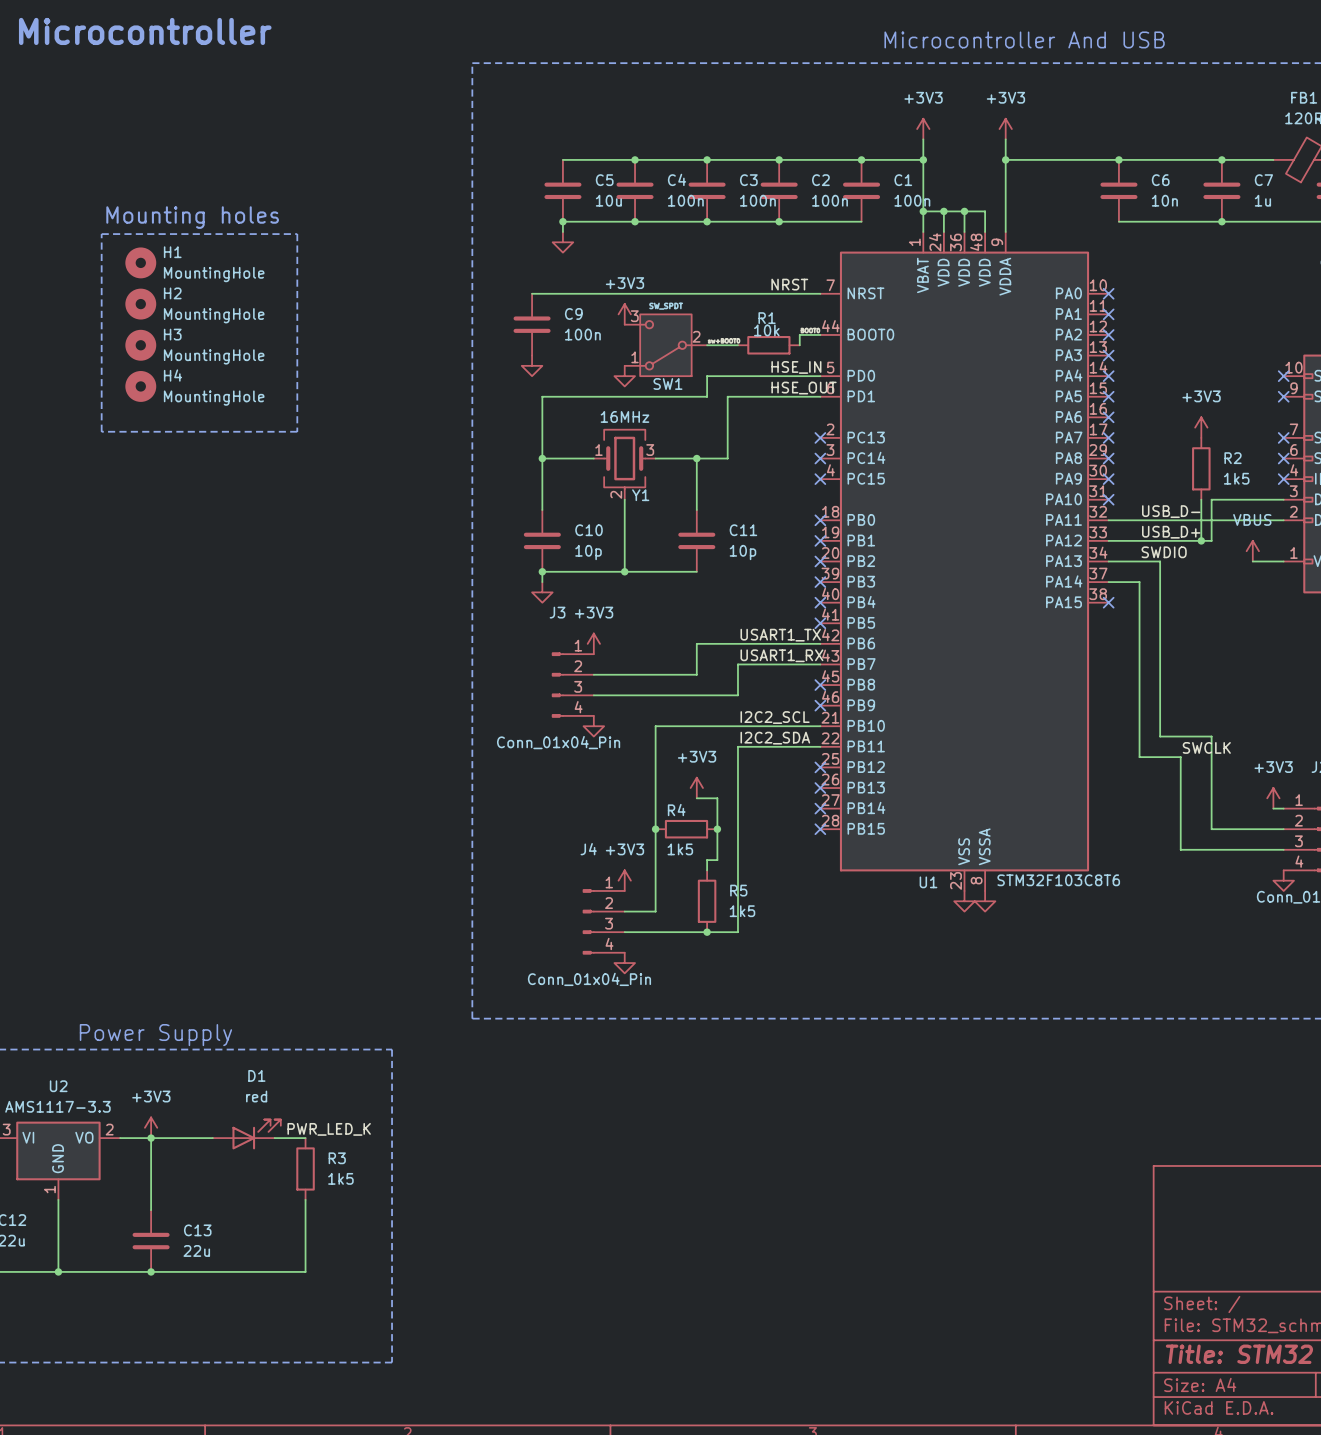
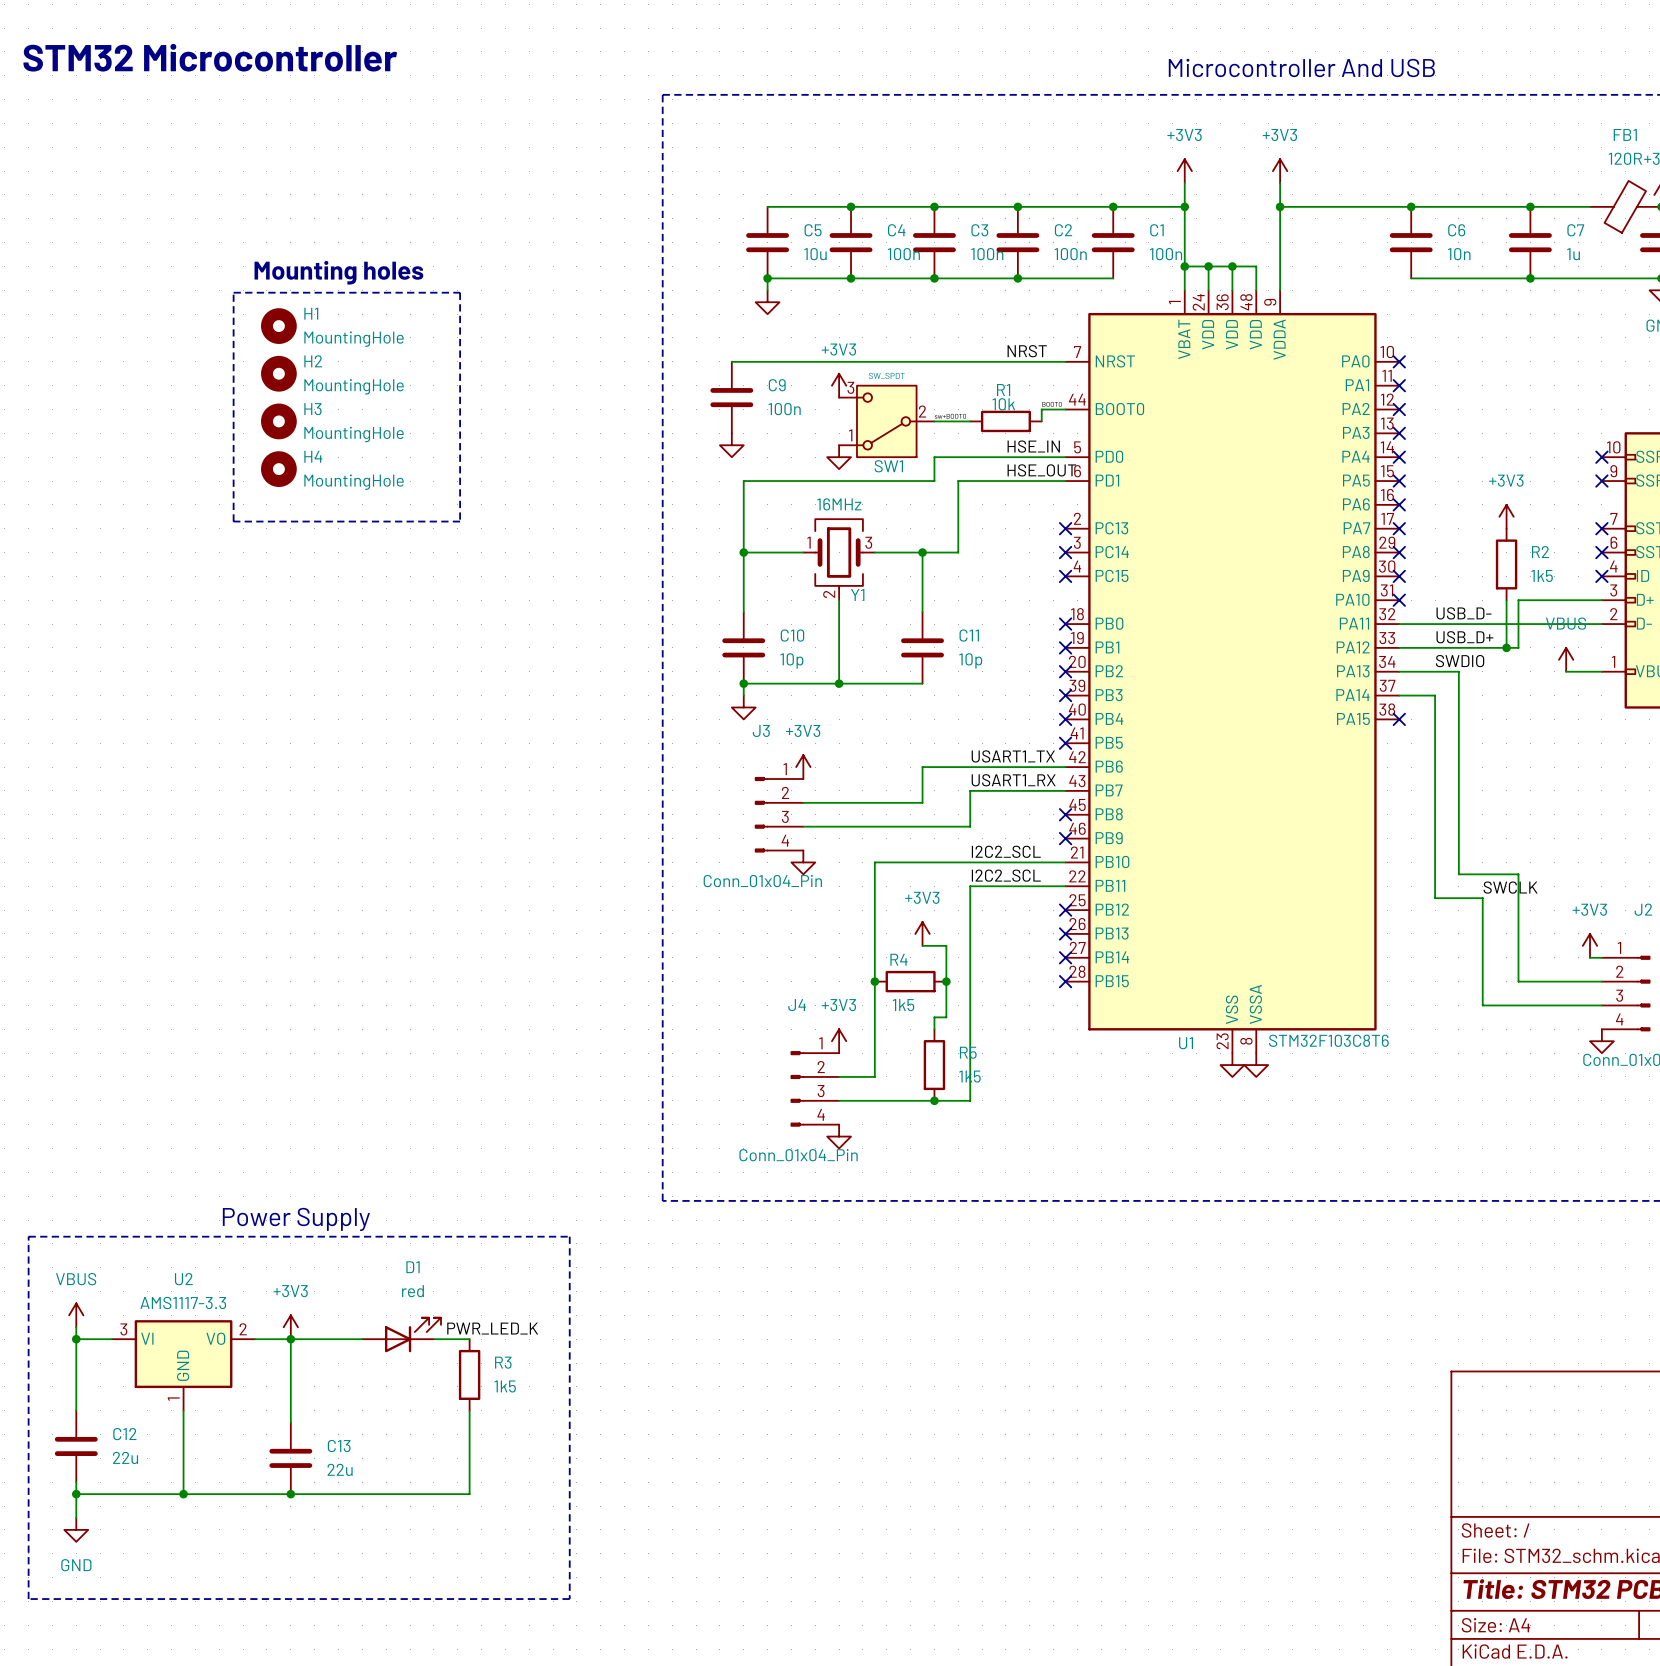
label: I2C2_SDA (775, 738) -> I2C2_SCL (1006, 875)

